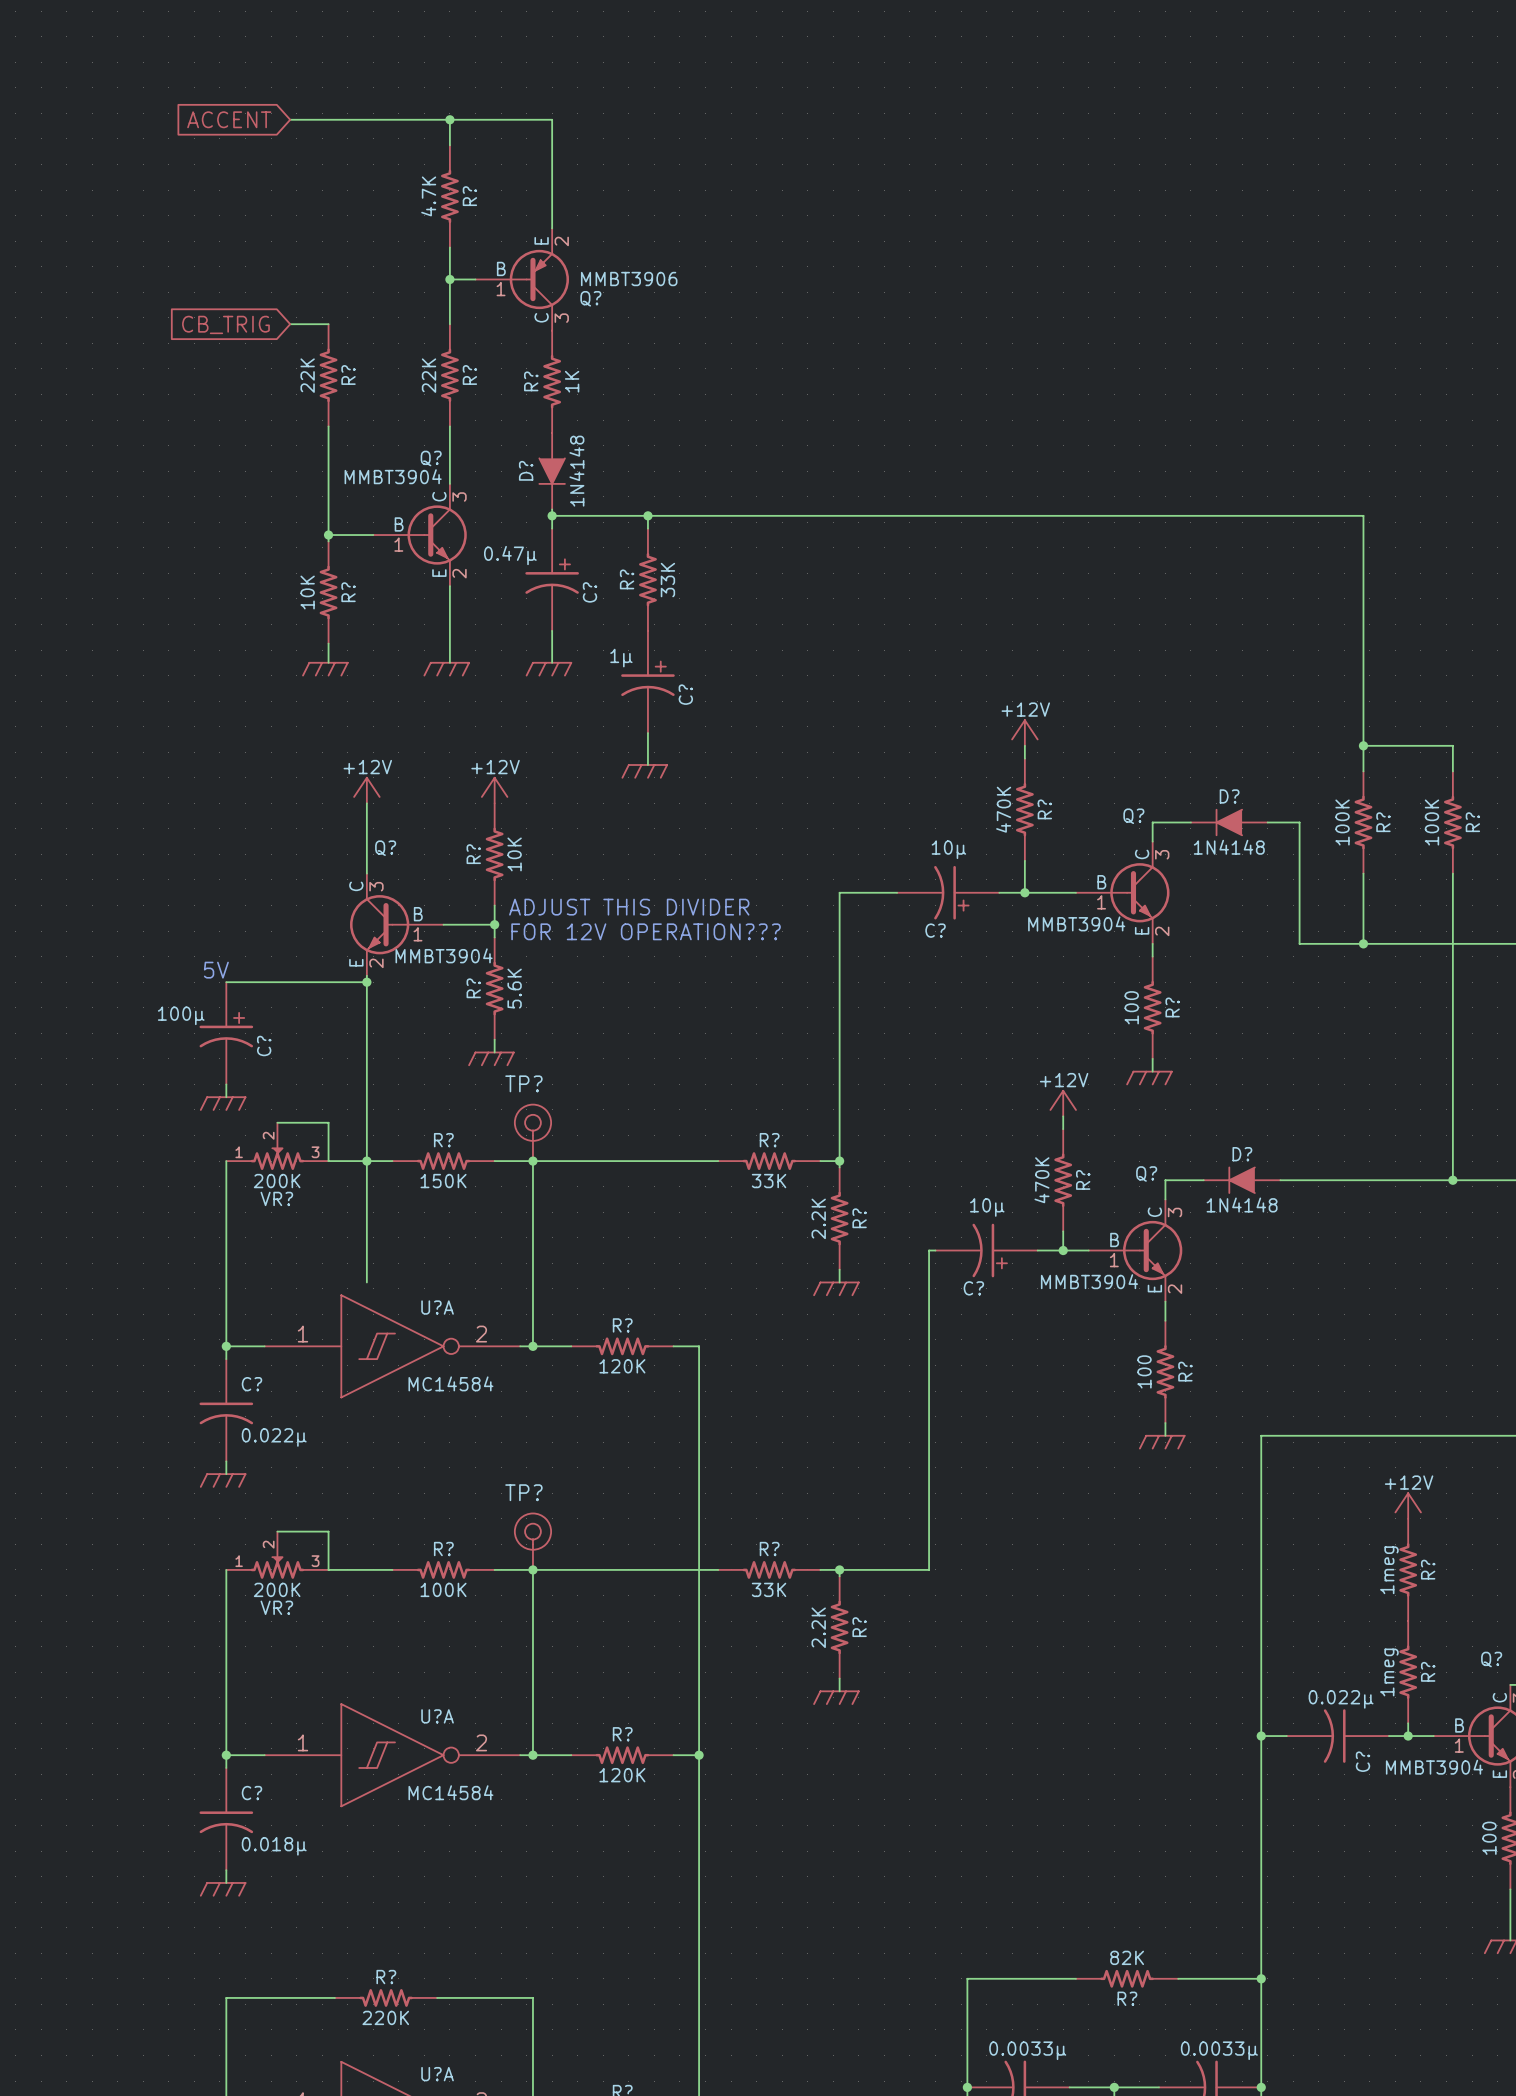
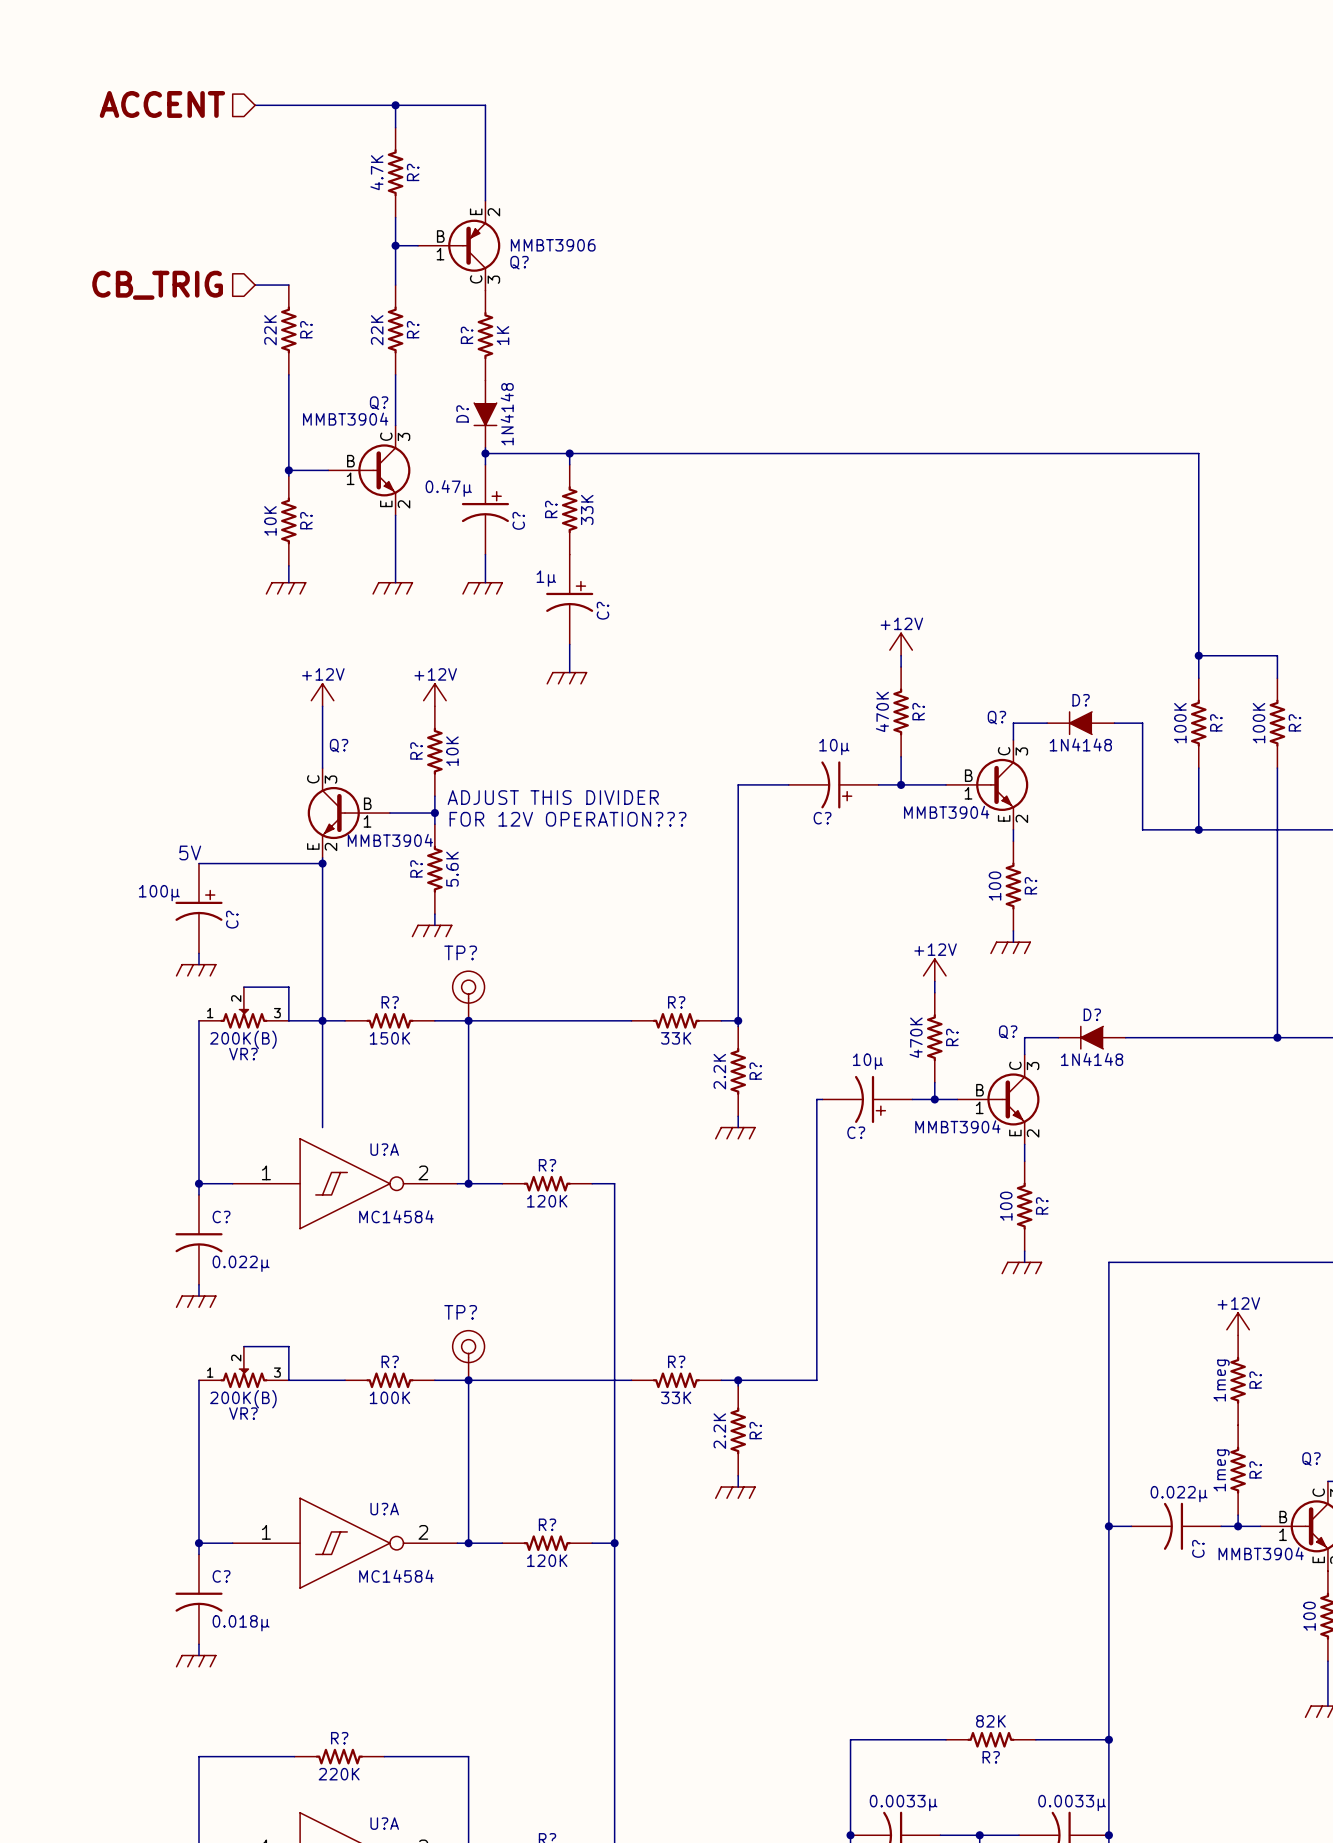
hierarchical label: none -> ACCENT (162, 104)
global label: ACCENT (229, 119) -> none
hierarchical label: none -> CB_TRIG (157, 285)
global label: CB_TRIG (225, 324) -> none
VR? value: 200K (277, 1181) -> 200K(B) (243, 1039)
VR? value: 200K (277, 1589) -> 200K(B) (243, 1399)

